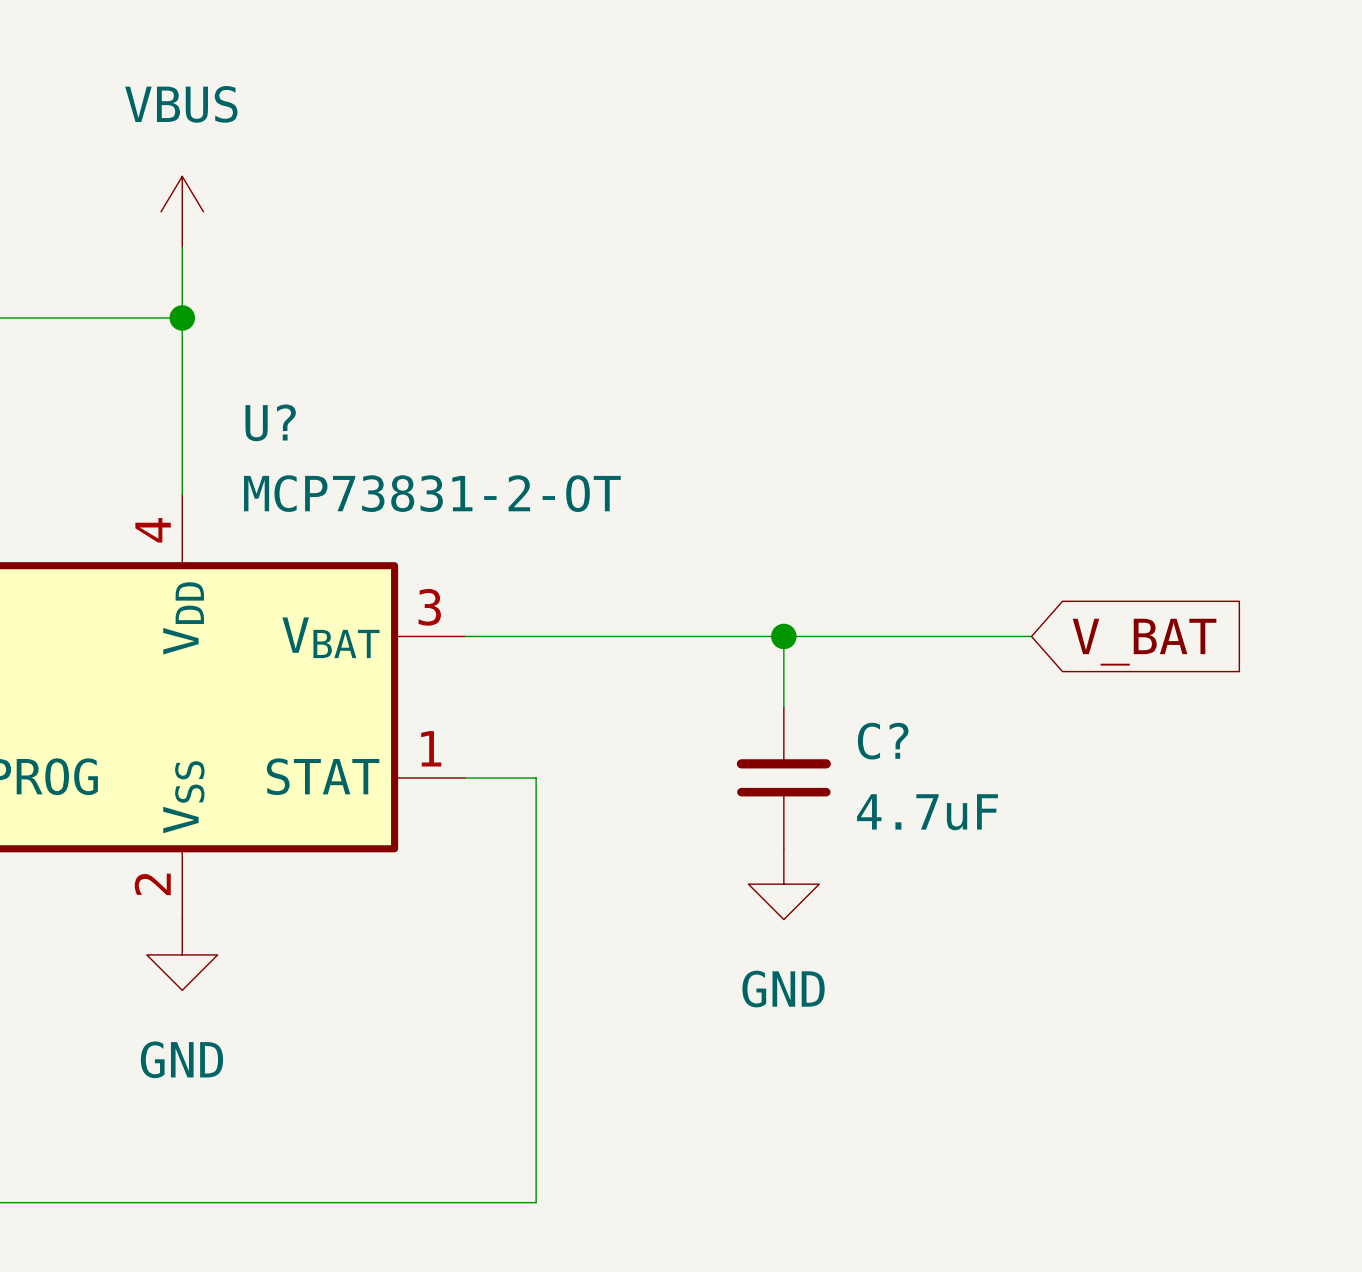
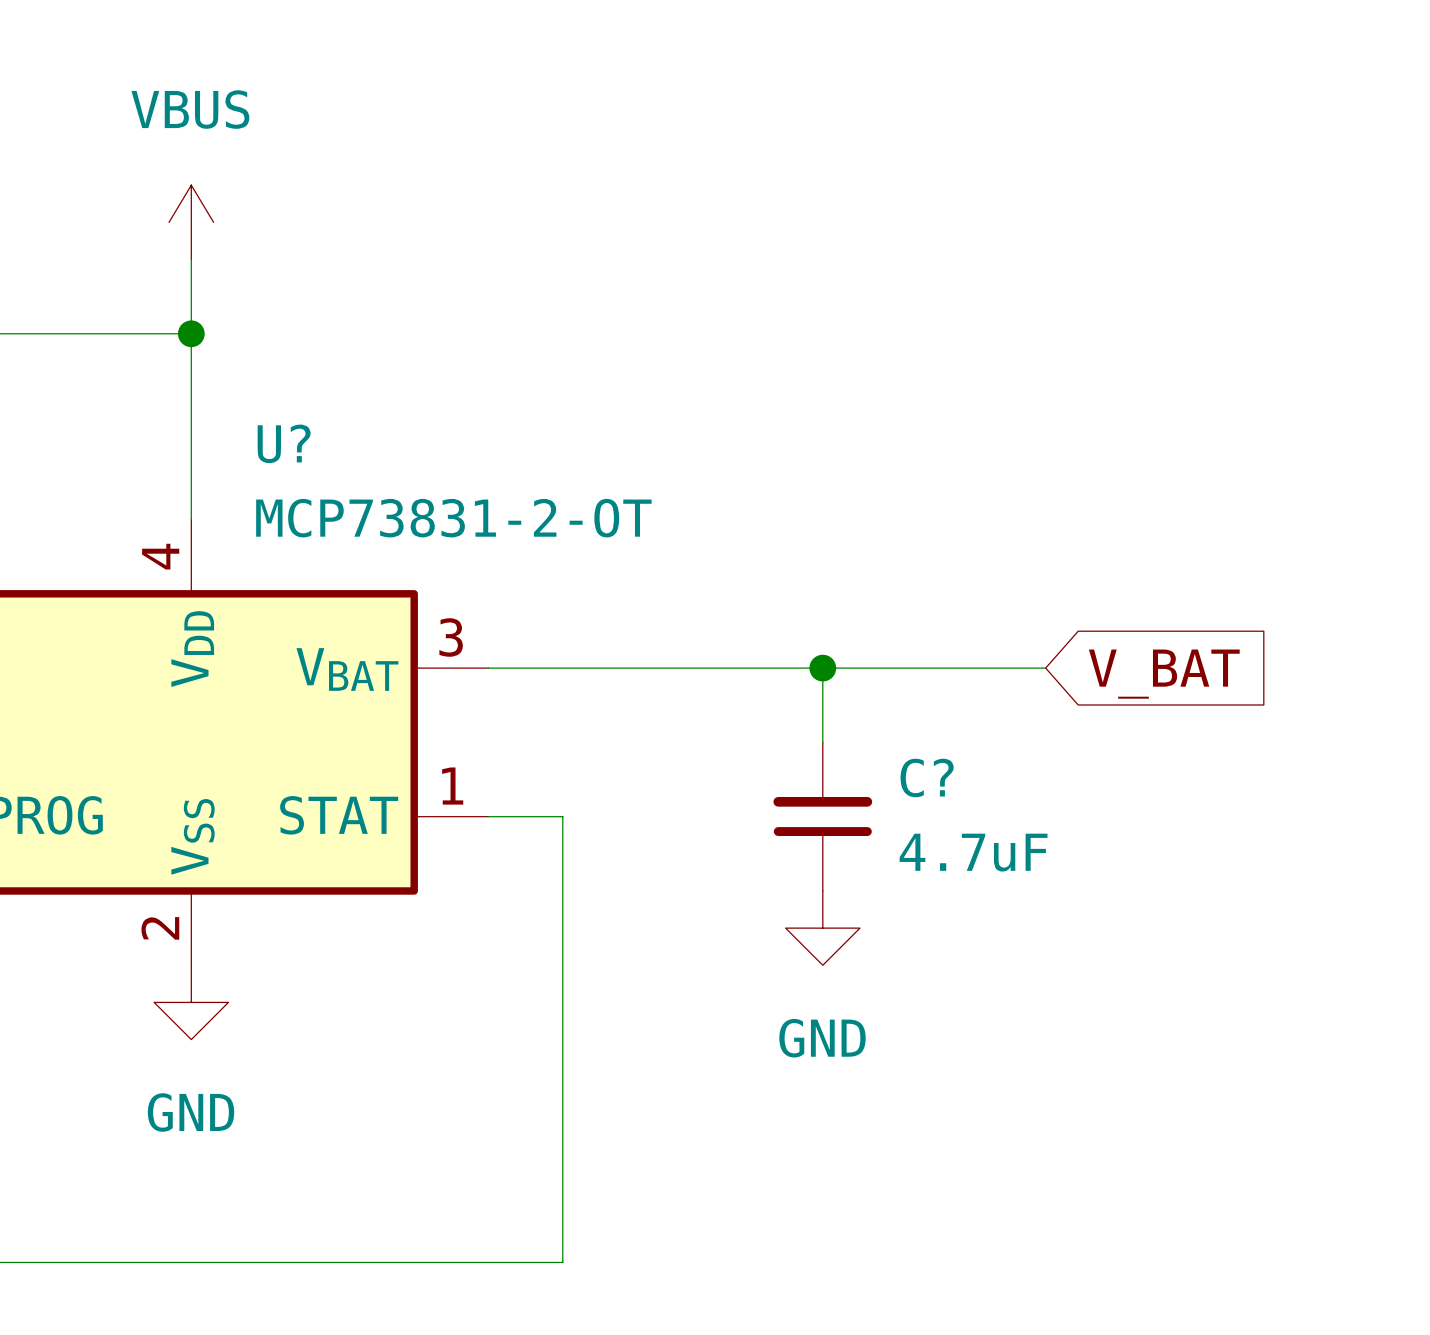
wire: (996, 636) (1031, 636) -> none
global label position: V_BAT (1144, 642) -> V_BAT (1164, 674)

